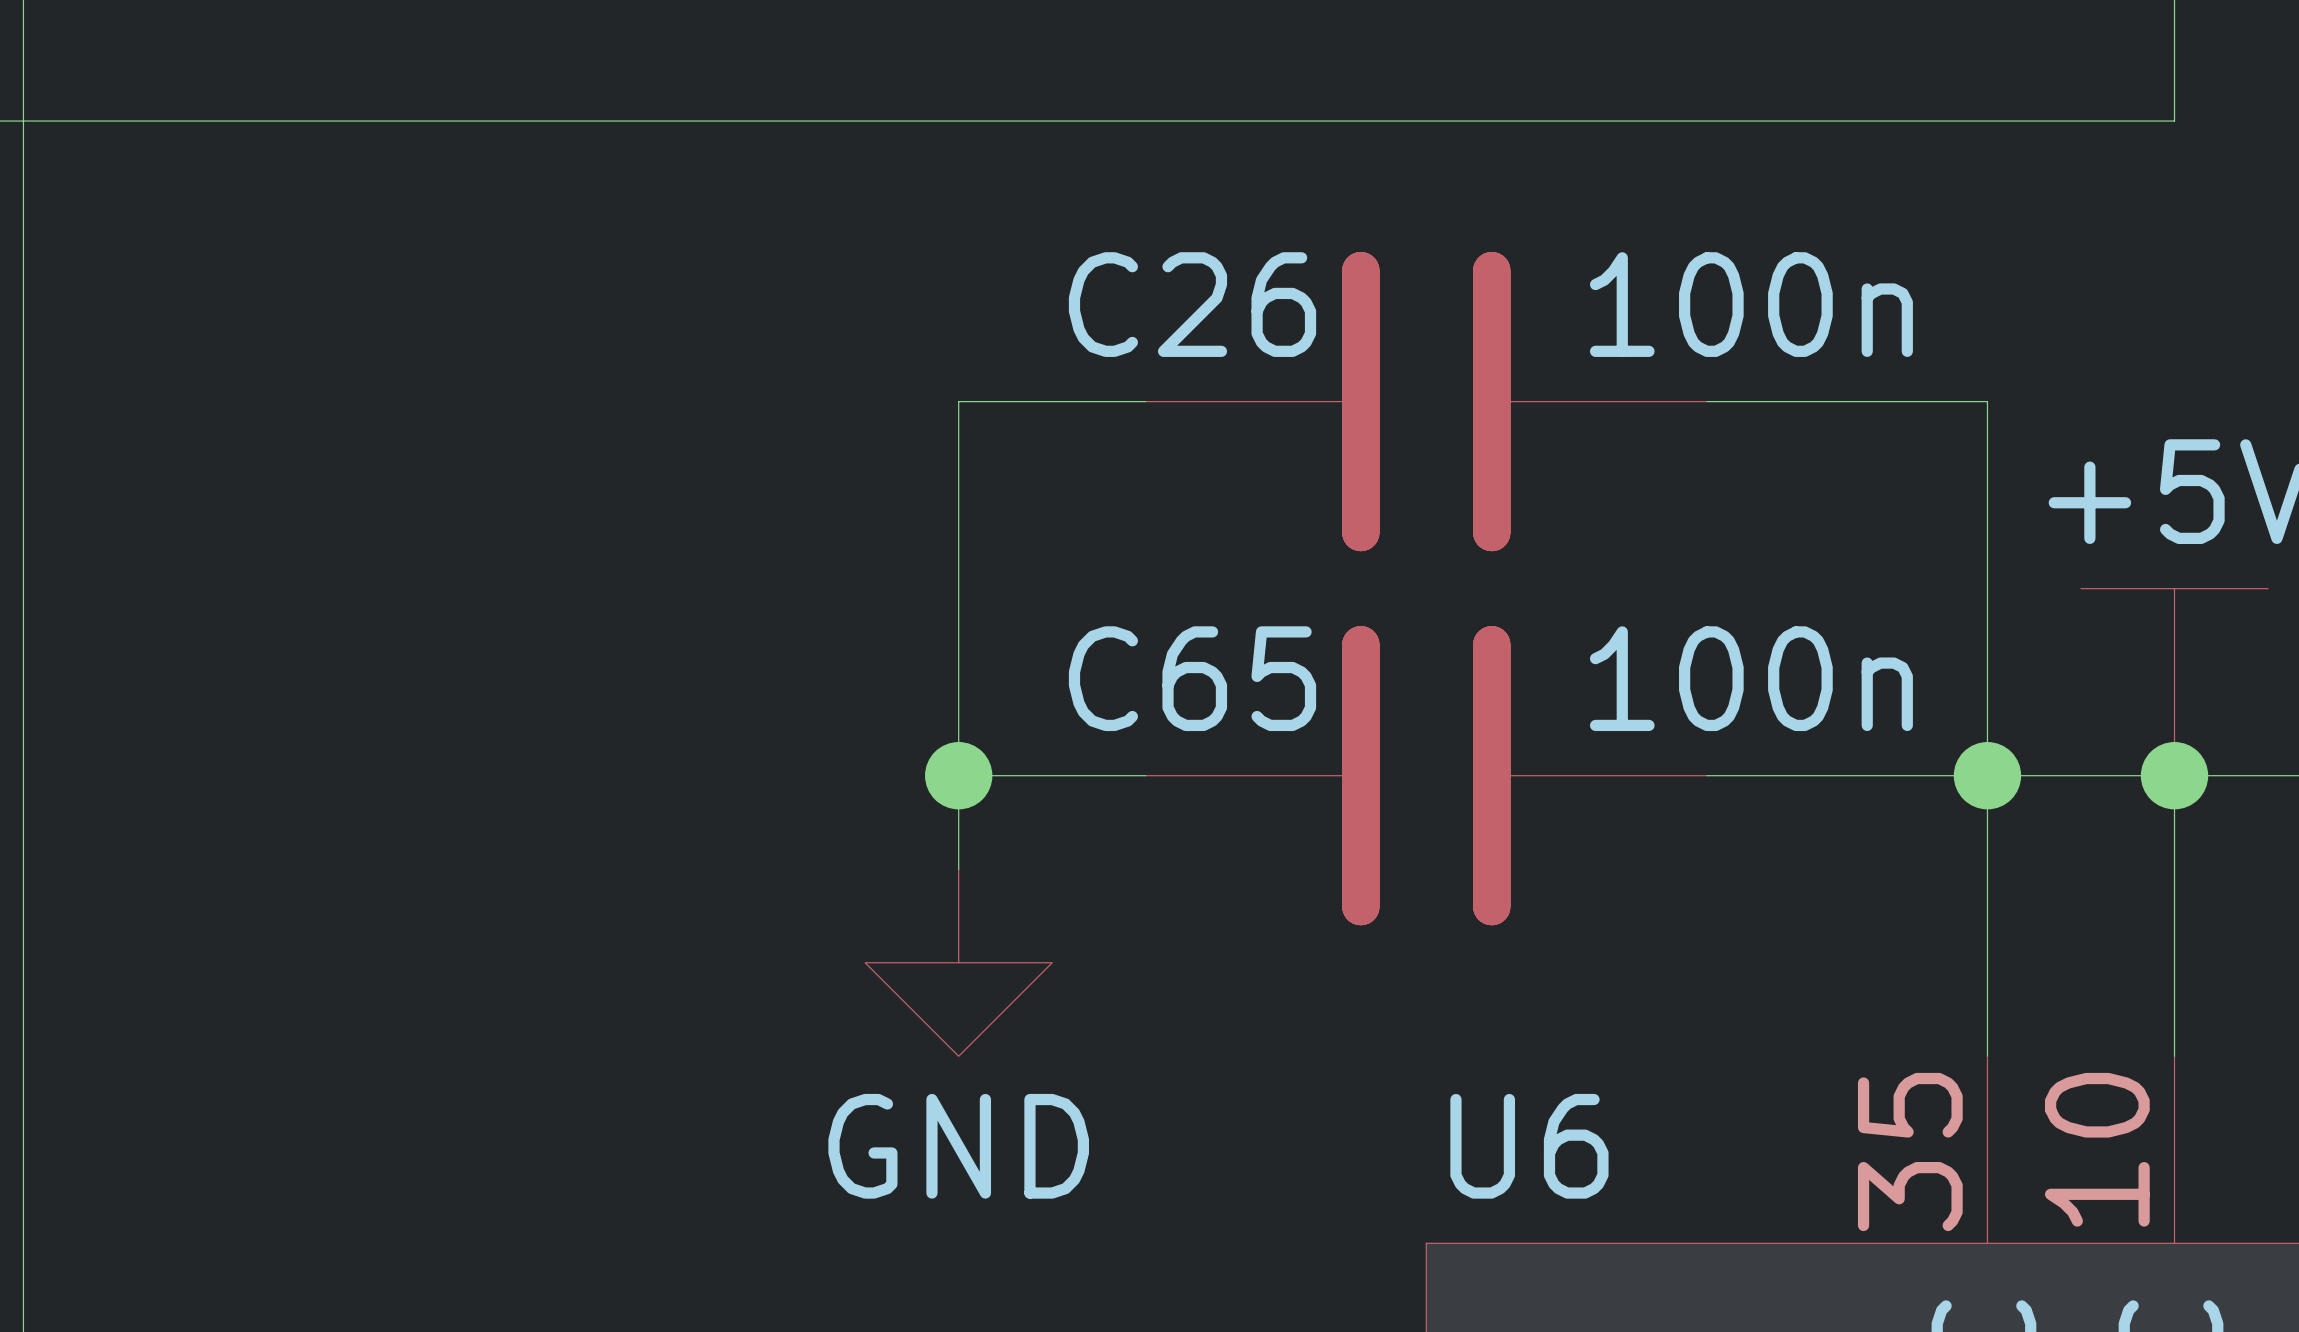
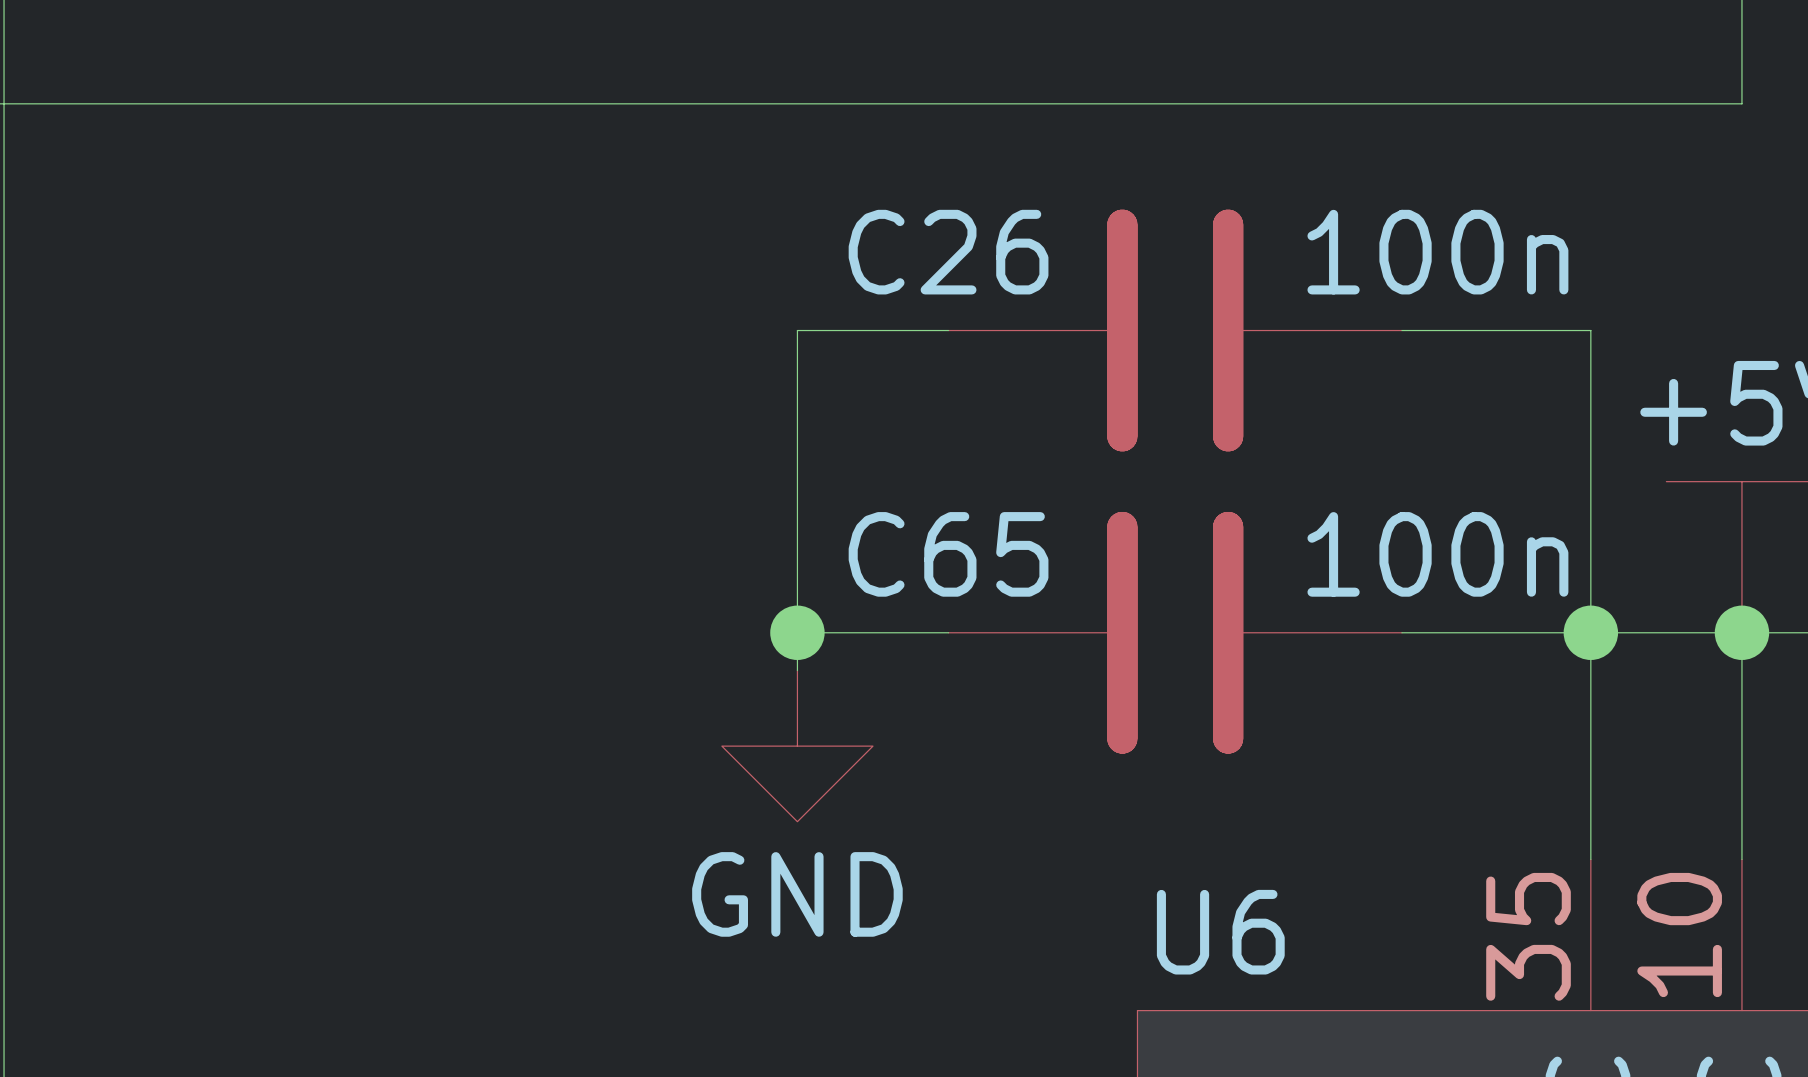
wire: (1005, 401) (958, 401) (958, 869) -> (797, 330) (797, 670)
C26 position: (1426, 401) -> (1175, 330)
junction position: (958, 775) -> (797, 632)
C65 position: (1426, 775) -> (1175, 632)
power symbol position: GND (958, 962) -> GND (797, 746)

